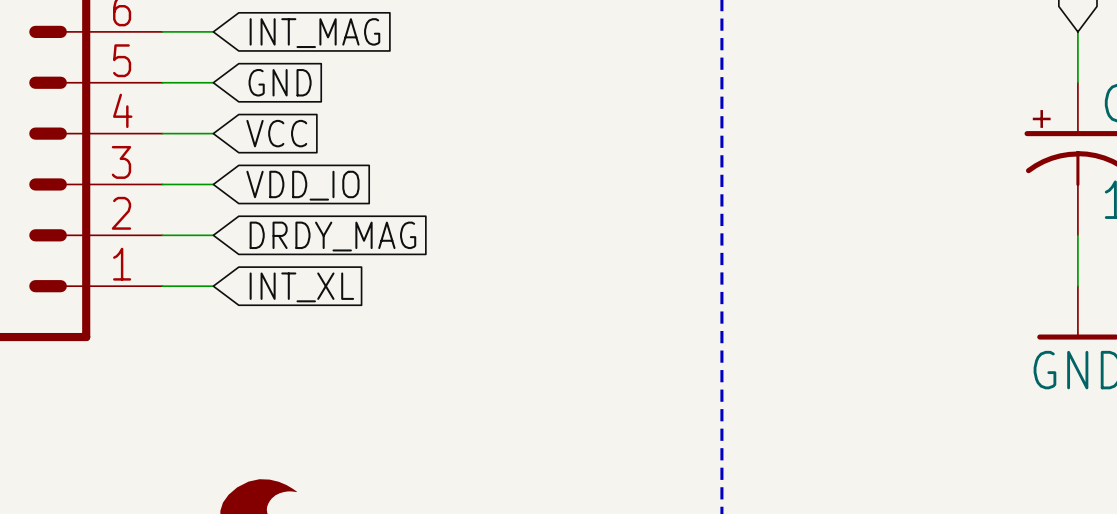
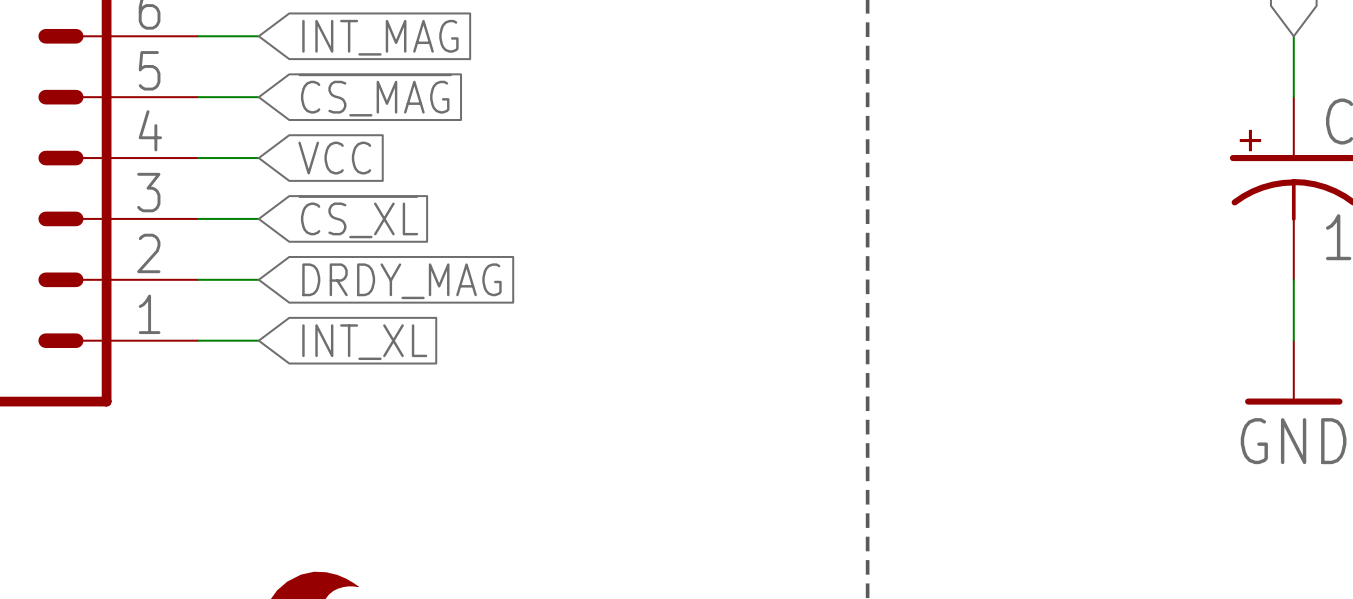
global label: GND (280, 82) -> ~{CS_MAG} (375, 95)
global label: VDD_IO (302, 185) -> ~{CS_XL} (358, 216)

